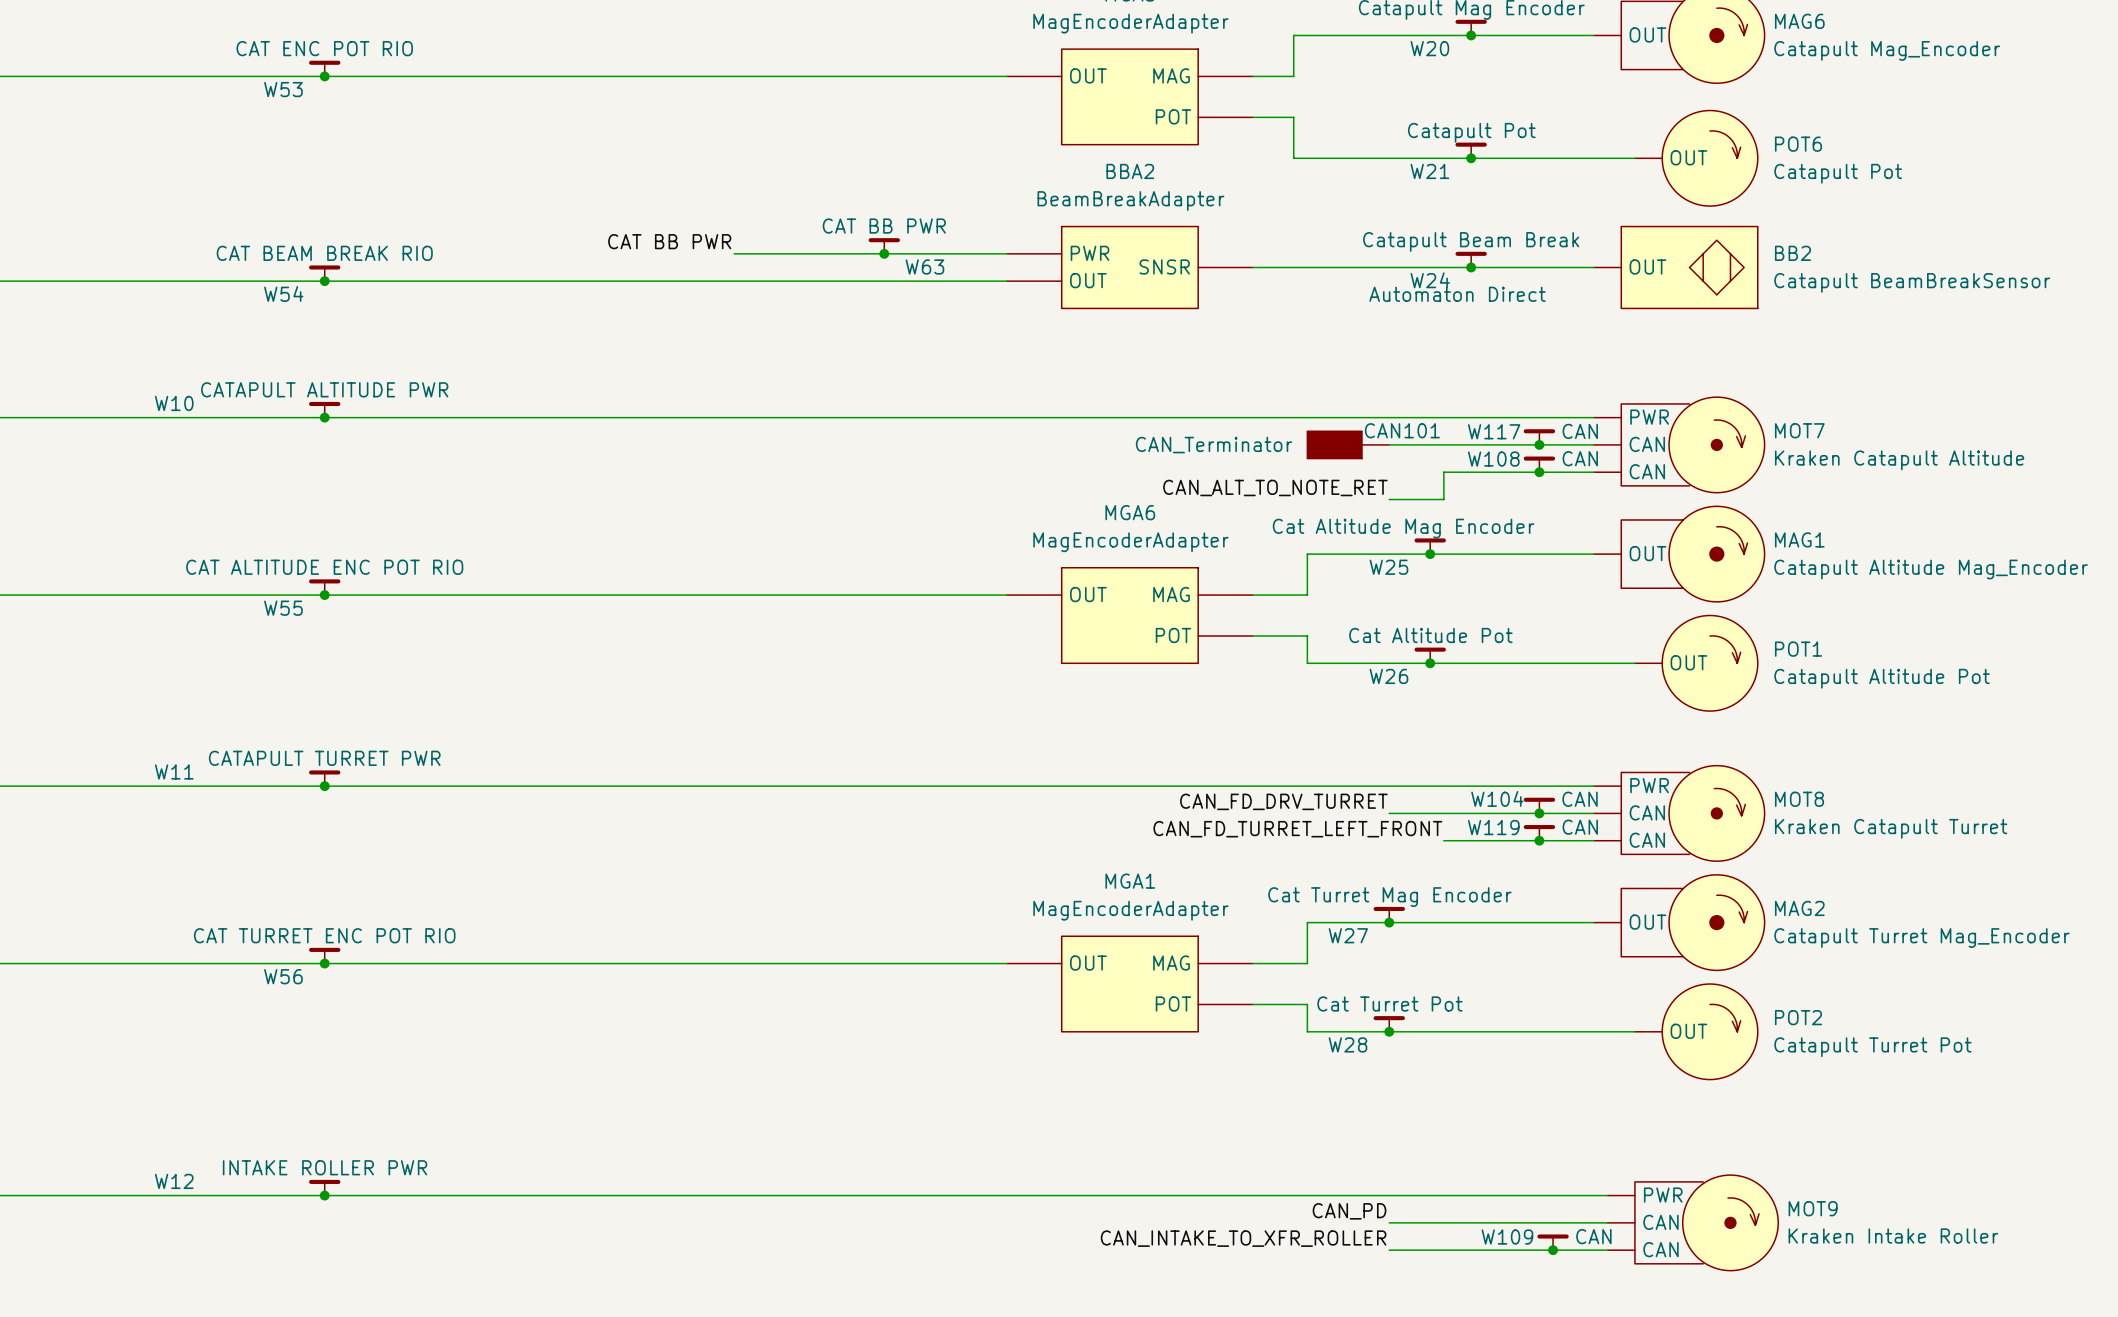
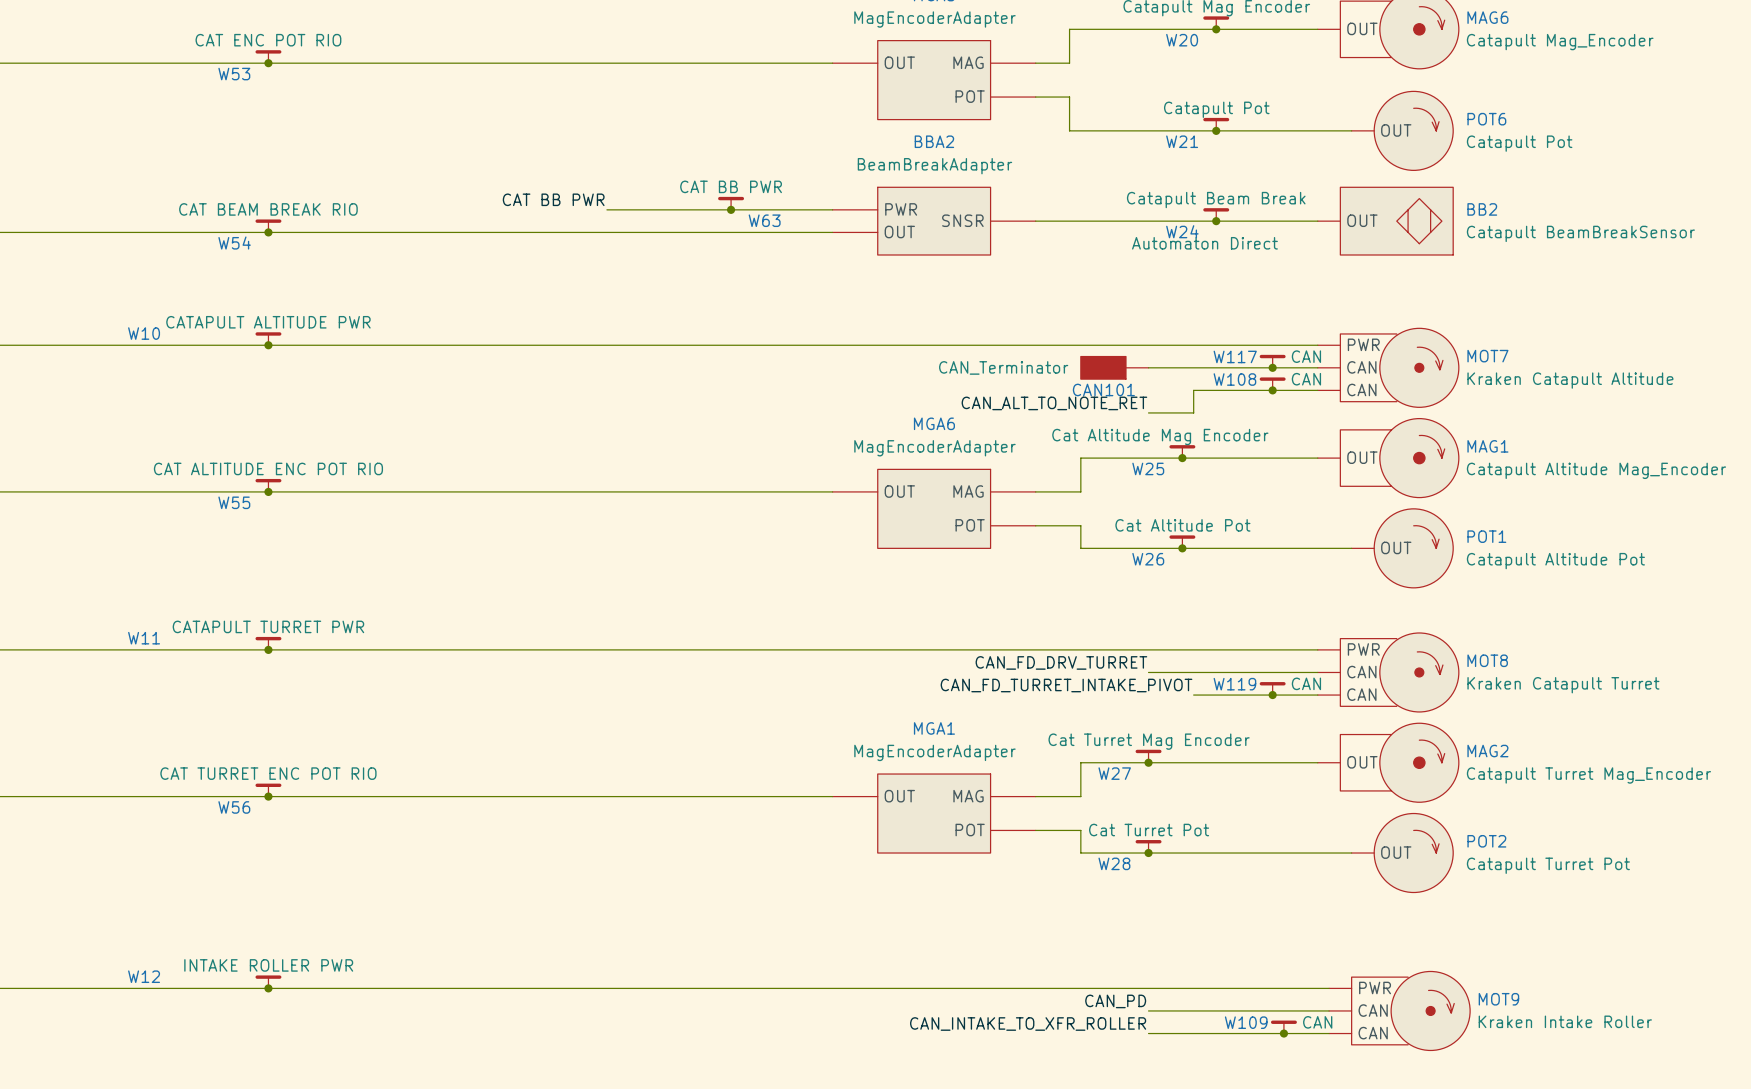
CAN101 name position: CAN101 (1402, 430) -> CAN101 (1103, 389)
W104: CAN (1539, 805) -> none
junction: (1539, 813) -> none
label: CAN_FD_TURRET_LEFT_FRONT (1297, 829) -> CAN_FD_TURRET_INTAKE_PIVOT (1066, 685)

